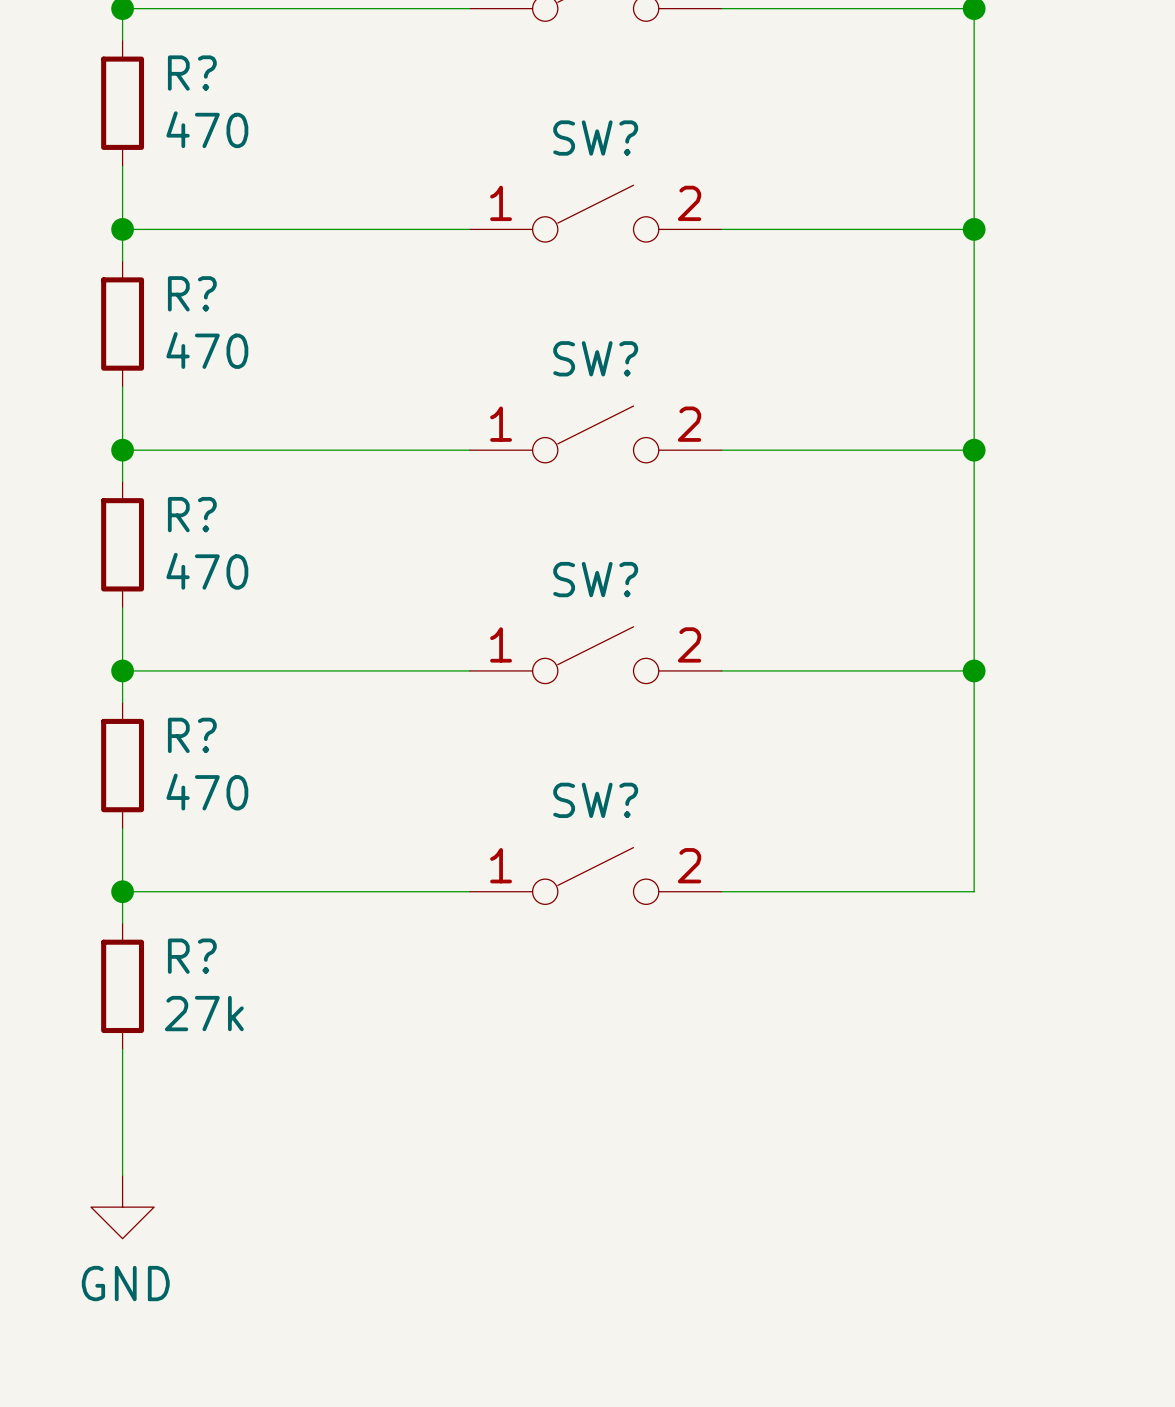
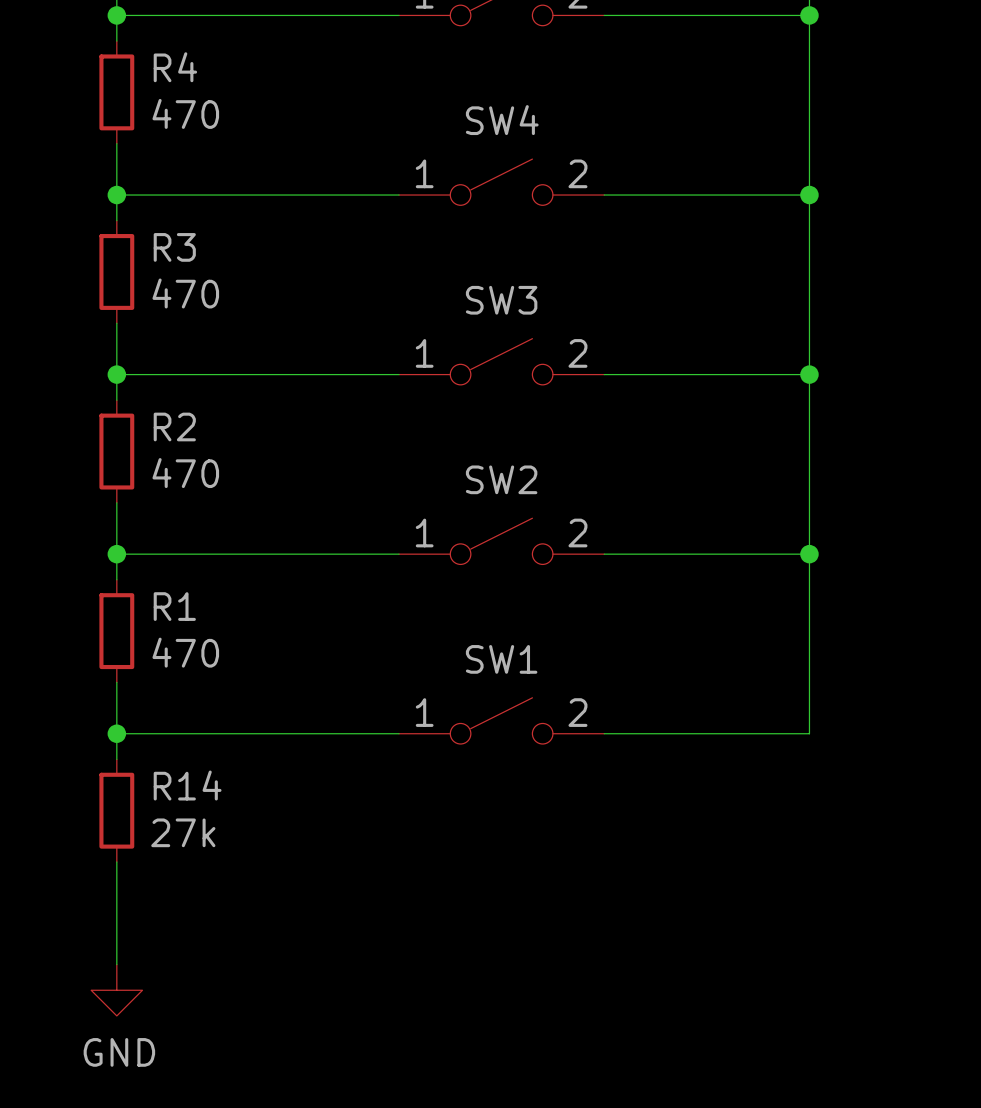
R? name: R? (192, 73) -> R4 (175, 67)
SW? name: SW? (595, 138) -> SW4 (502, 120)
R? name: R? (192, 293) -> R3 (174, 247)
SW? name: SW? (595, 358) -> SW3 (501, 300)
R? name: R? (192, 514) -> R2 (174, 426)
SW? name: SW? (595, 579) -> SW2 (501, 479)
R? name: R? (192, 735) -> R1 (174, 606)
SW? name: SW? (595, 800) -> SW1 (501, 659)
R? name: R? (192, 956) -> R14 (187, 785)

